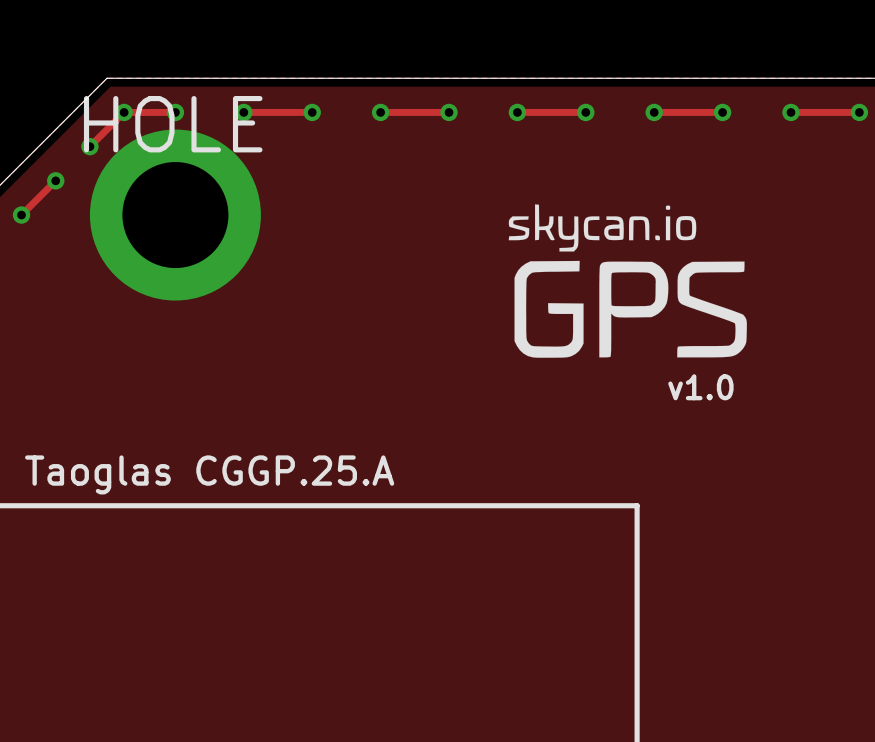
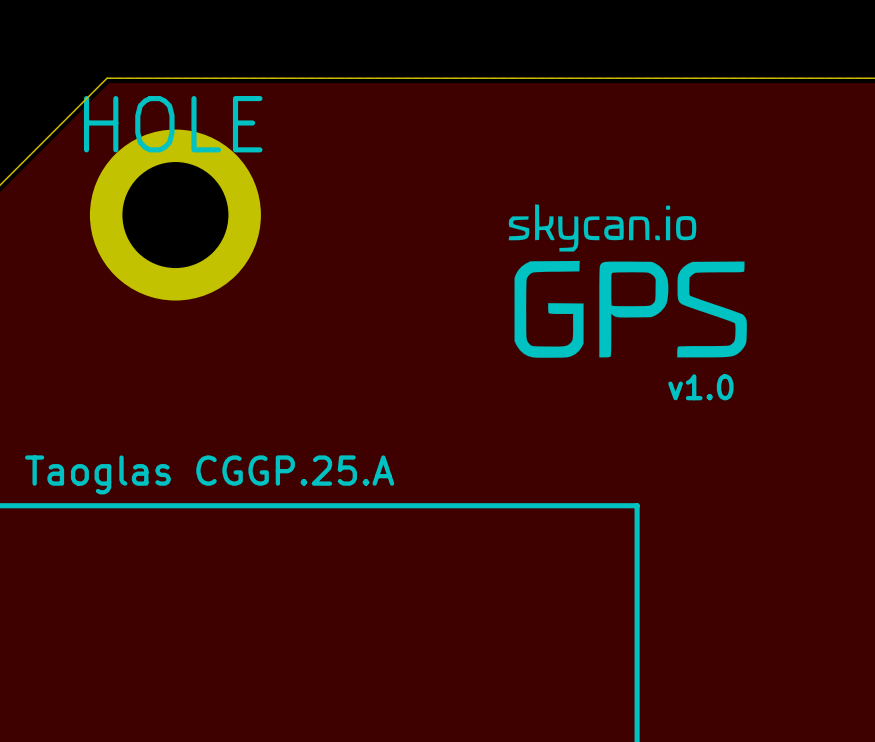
via: (124, 112) -> none
track: (175, 112) (124, 112) (89, 146) -> none
via: (175, 112) -> none
track: (243, 112) (312, 112) -> none
via: (243, 112) -> none
via: (312, 112) -> none
track: (380, 112) (449, 112) -> none
via: (380, 112) -> none
via: (449, 112) -> none
track: (517, 112) (585, 112) -> none
via: (517, 112) -> none
via: (585, 112) -> none
track: (654, 112) (722, 112) -> none
via: (654, 112) -> none
via: (722, 112) -> none
track: (791, 112) (859, 112) -> none
via: (791, 112) -> none
via: (859, 112) -> none
via: (89, 146) -> none
track: (55, 180) (21, 215) -> none
via: (55, 180) -> none
via: (21, 215) -> none

